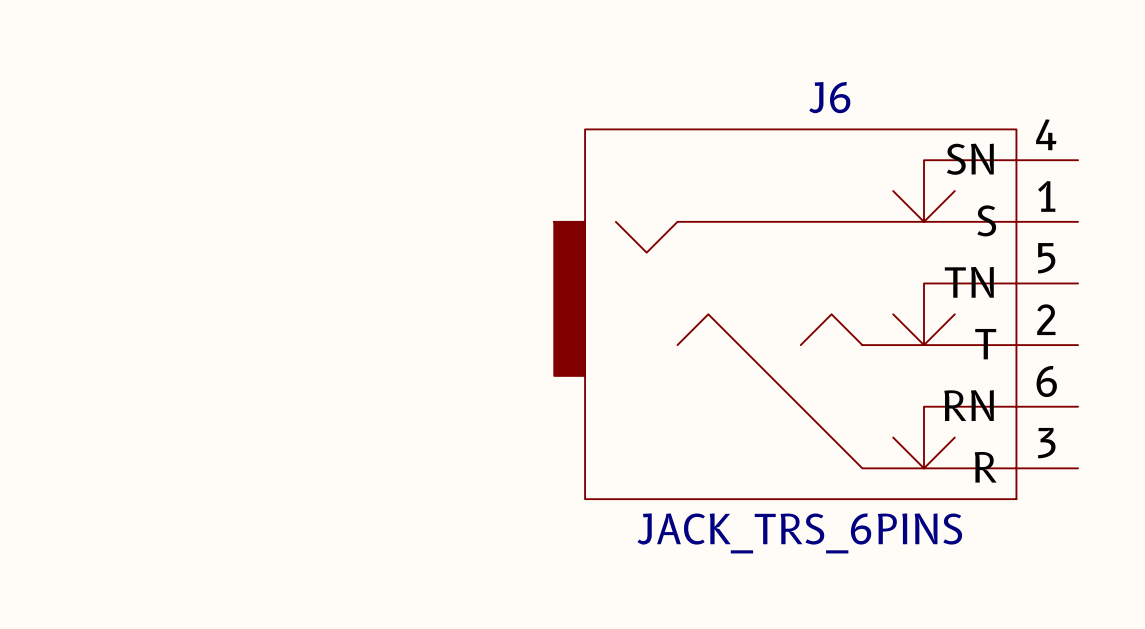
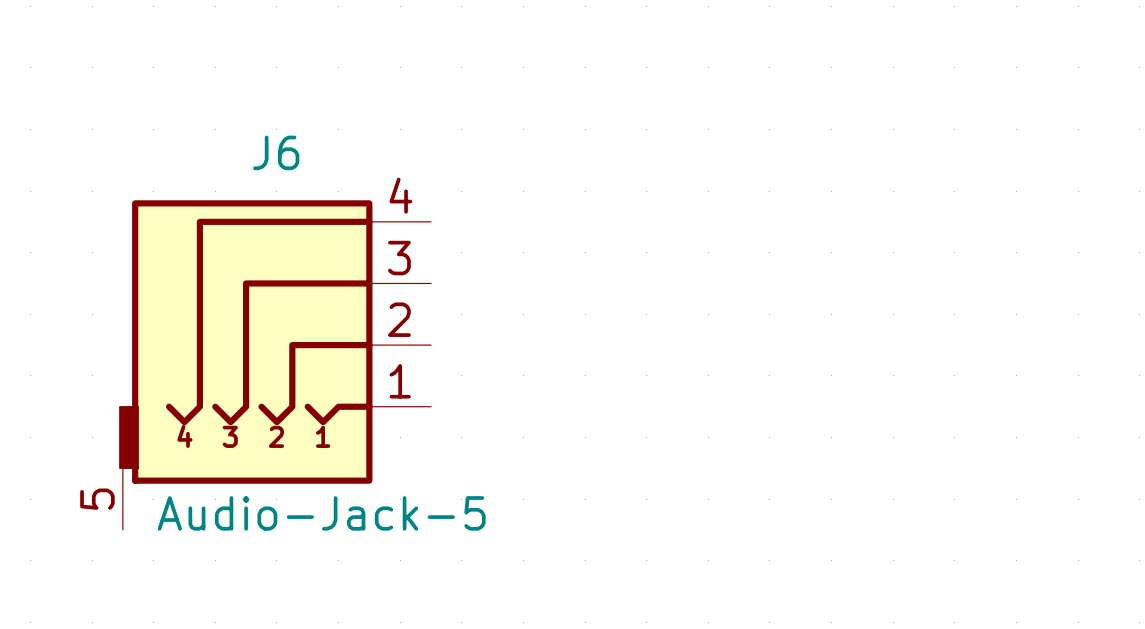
J6 symbol: [554, 129, 1079, 500] -> [119, 200, 431, 530]
J6 value: JACK_TRS_6PINS (799, 533) -> Audio-Jack-5 (321, 513)

